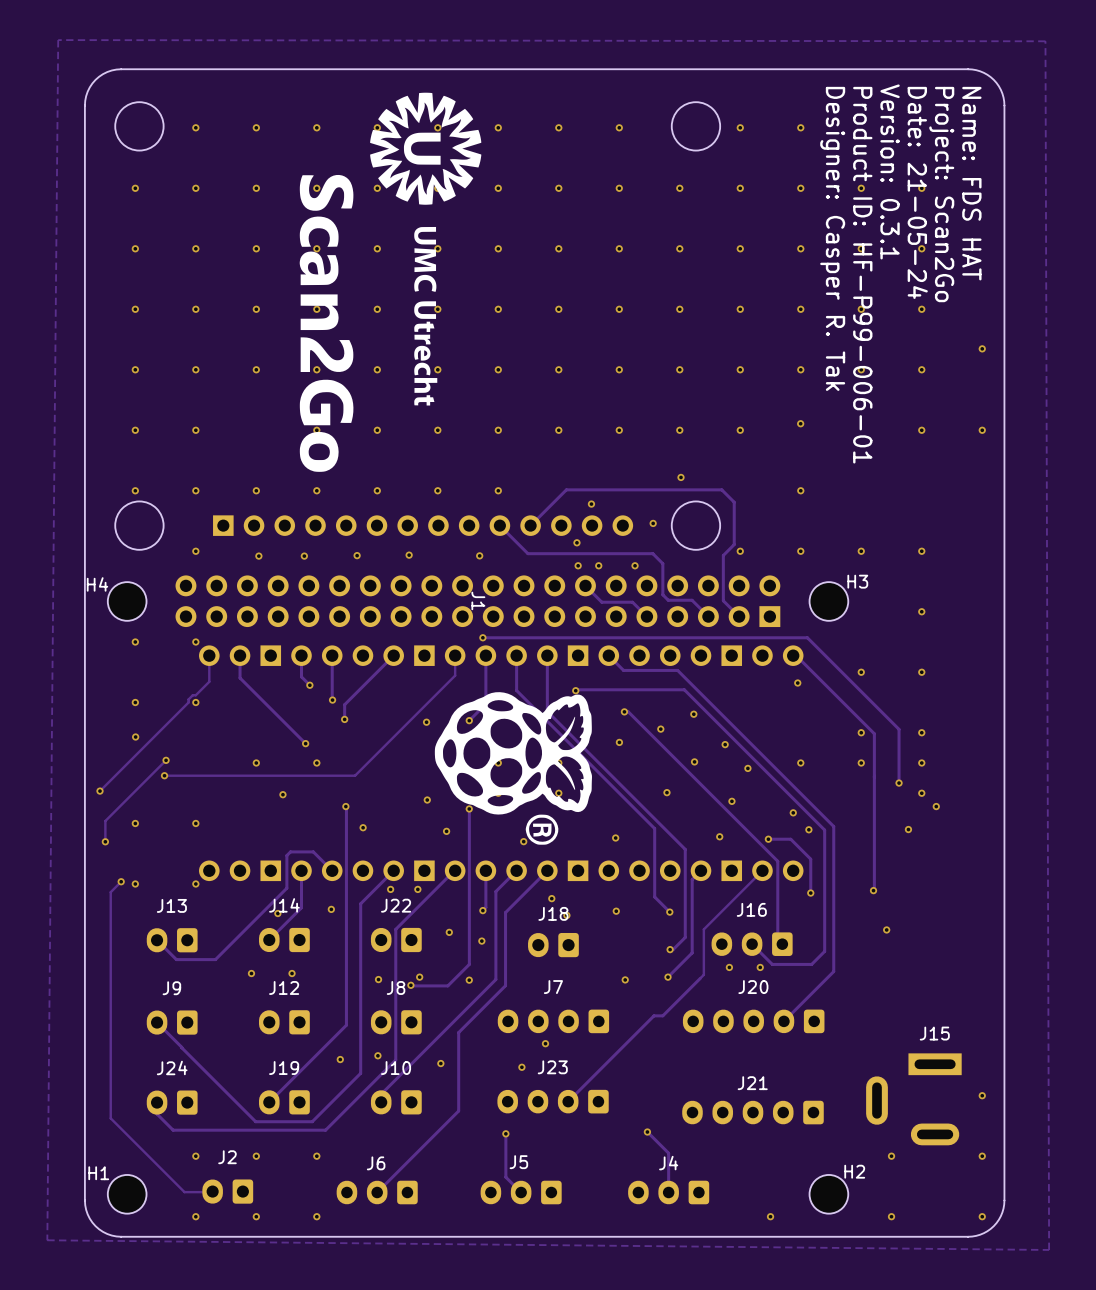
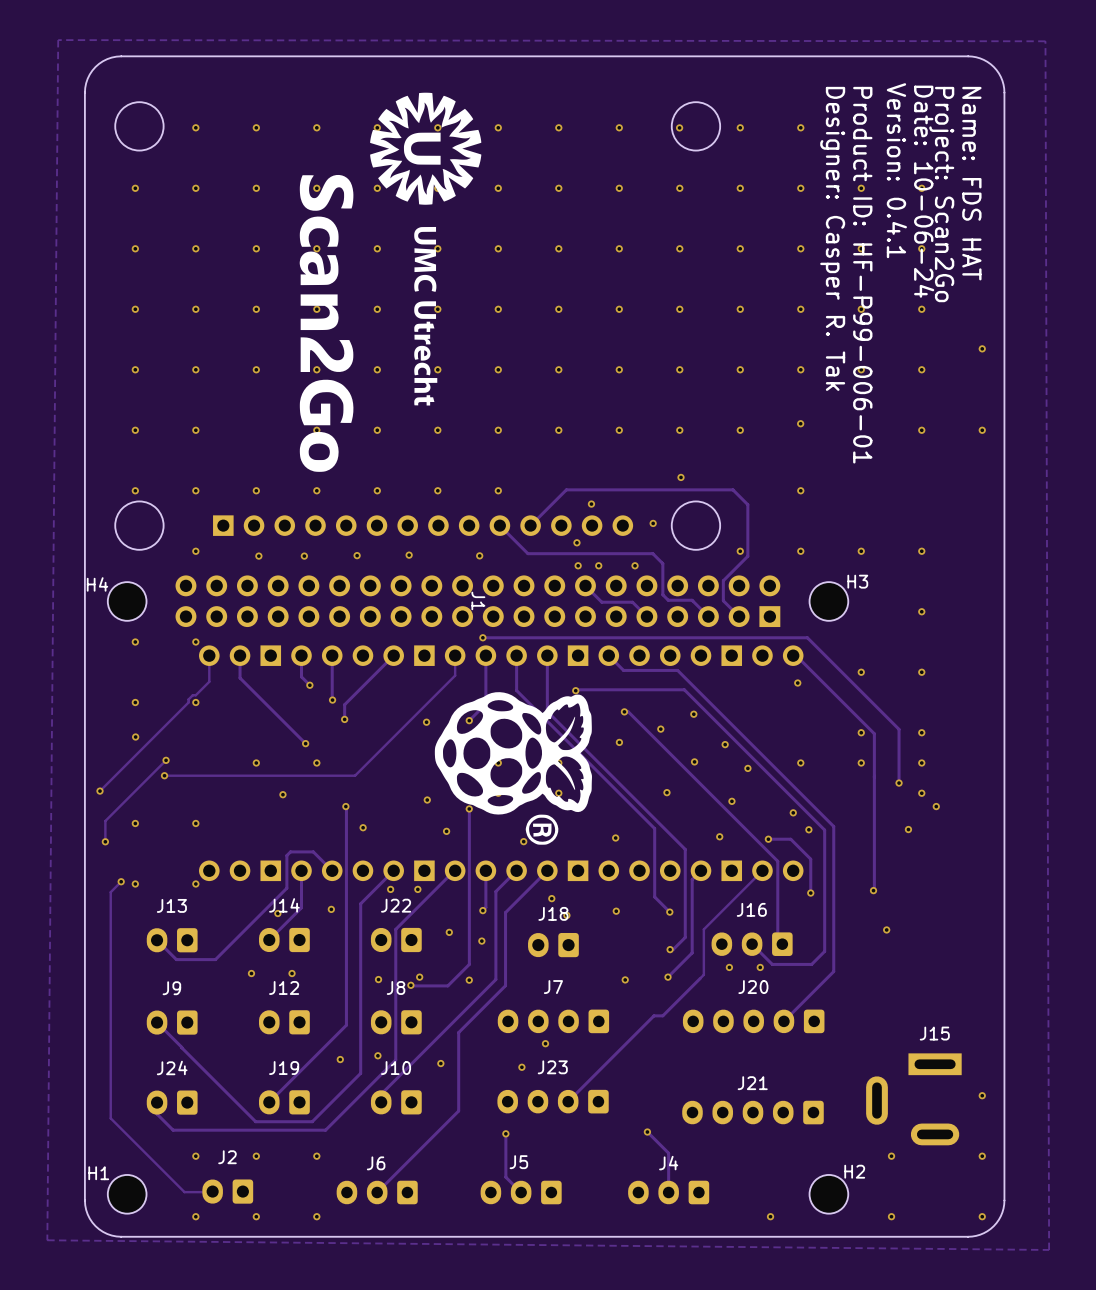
board edge: (1004, 105) (1002, 93) (993, 79) (980, 71) (968, 69) (121, 69) (107, 72) (95, 79) (87, 91) (84, 105) -> (1004, 105) (1003, 84) (996, 70) (983, 59) (968, 56) (121, 56) (107, 59) (92, 70) (86, 83) (84, 105)
via: none -> (679, 127)
text: Version: 0.3.1 (890, 171) -> Version: 0.4.1 (896, 170)
text: Date: 21-05-24 (917, 192) -> Date: 10-06-24 (924, 191)
track: (721, 489) (734, 502) (734, 544) (723, 555) (723, 580) -> (721, 489) (732, 489) (747, 504) (747, 556) (723, 580)

